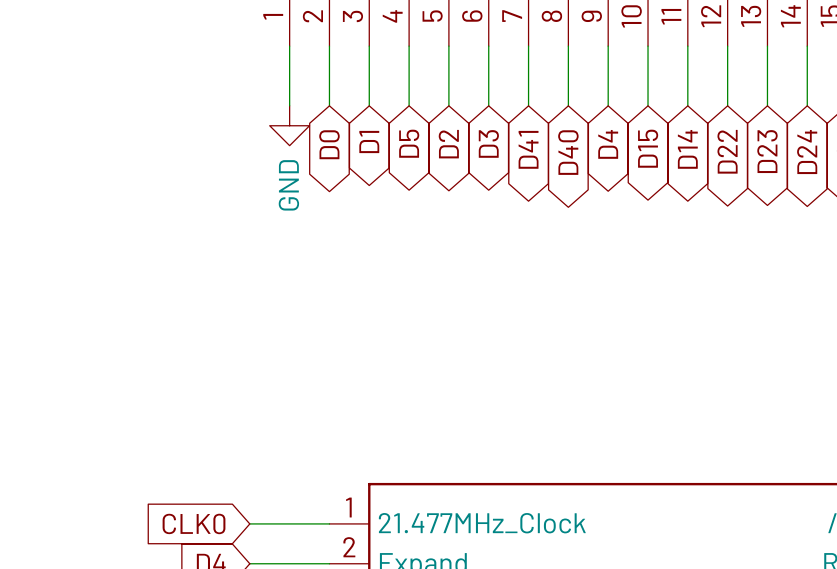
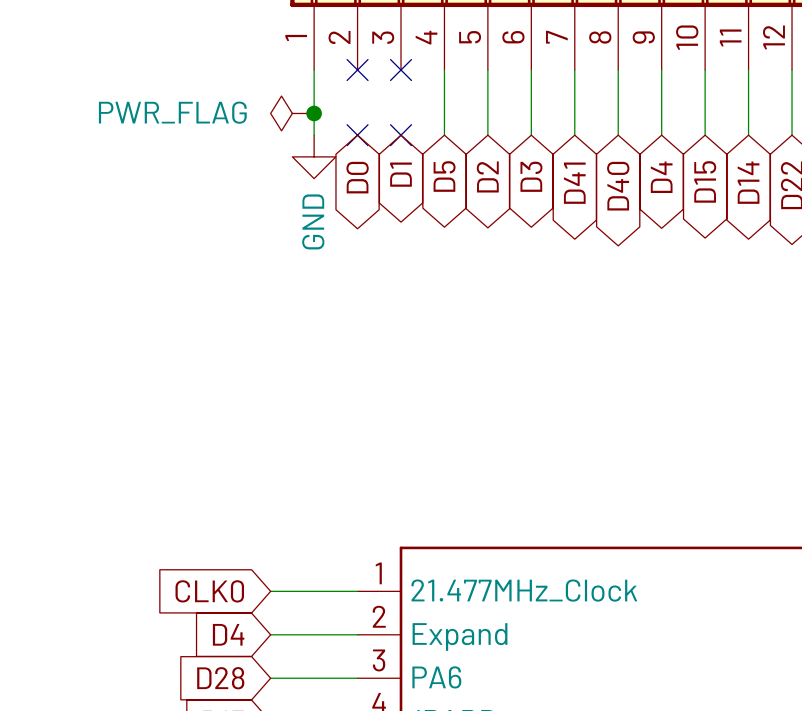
wire: (329, 46) (329, 105) -> none
no-connect mark: none -> (357, 70)
wire: (369, 46) (369, 105) -> none
no-connect mark: none -> (401, 70)
power symbol: none -> PWR_FLAG (292, 113)
junction: none -> (314, 113)
no-connect mark: none -> (357, 135)
no-connect mark: none -> (401, 135)

